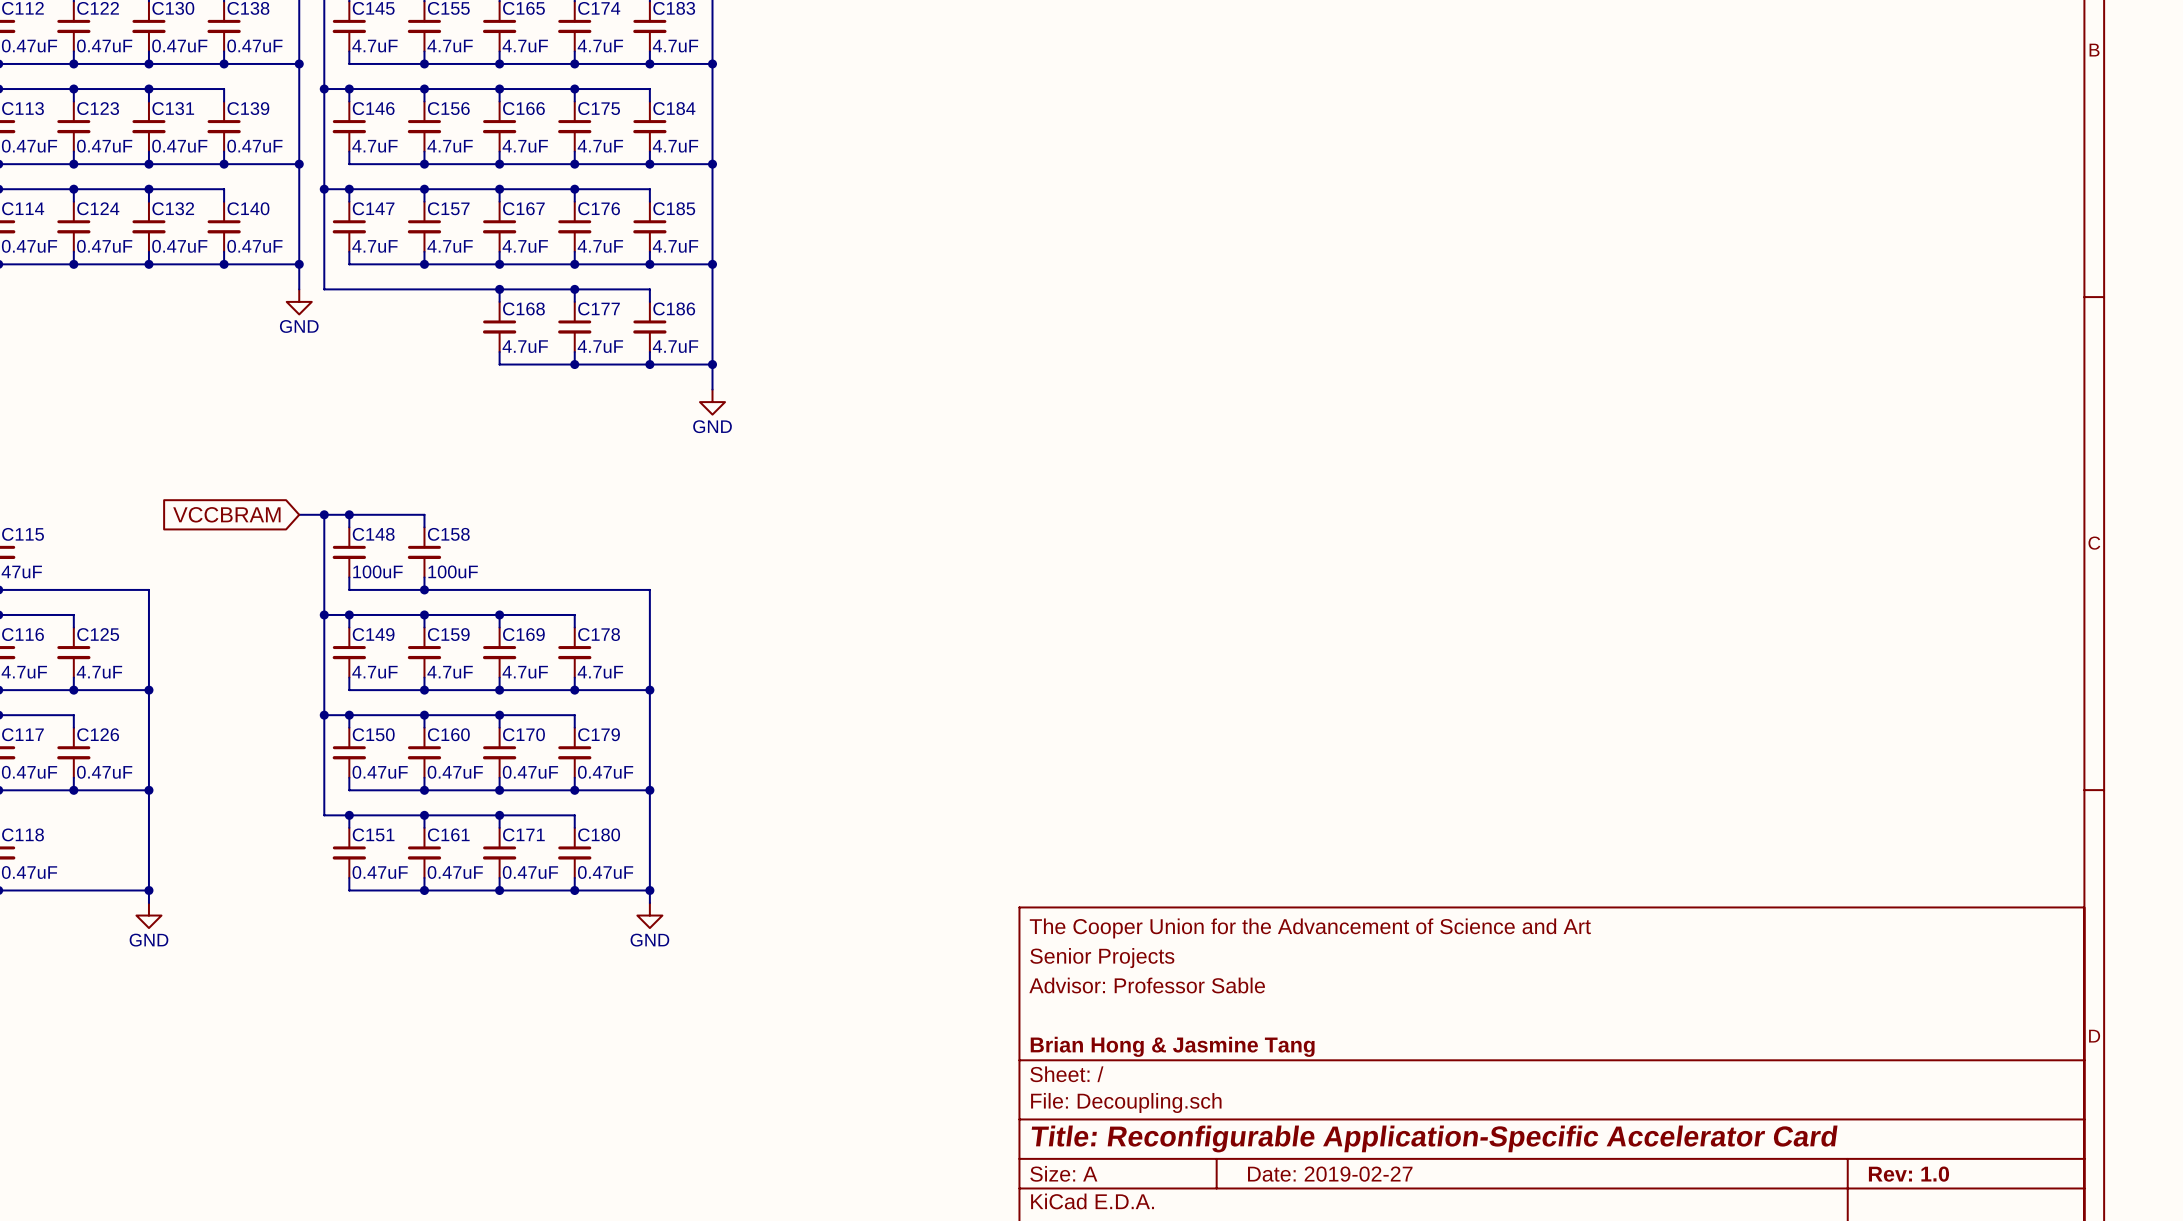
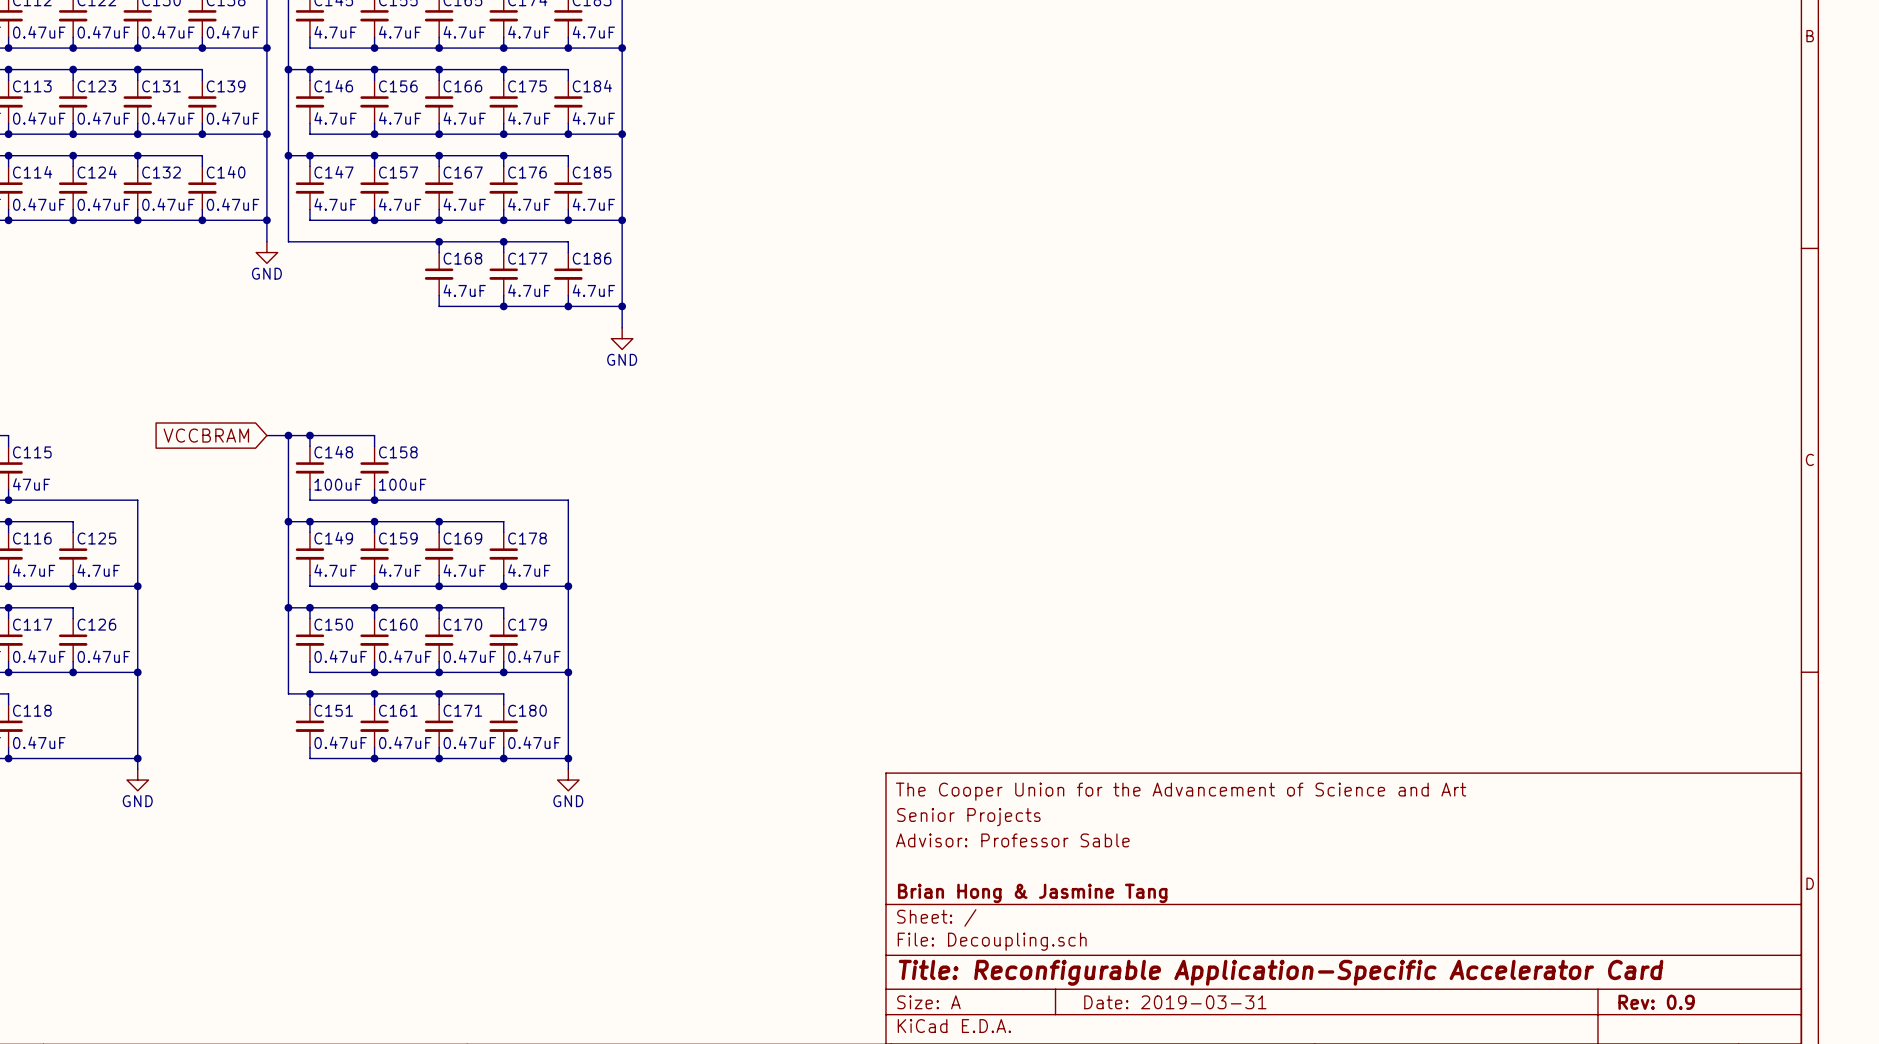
title block: Date: 2019-02-27 (1330, 1174) -> Date: 2019-03-31 (1175, 1002)
title block: Rev: 1.0 (1908, 1174) -> Rev: 0.9 (1656, 1002)

